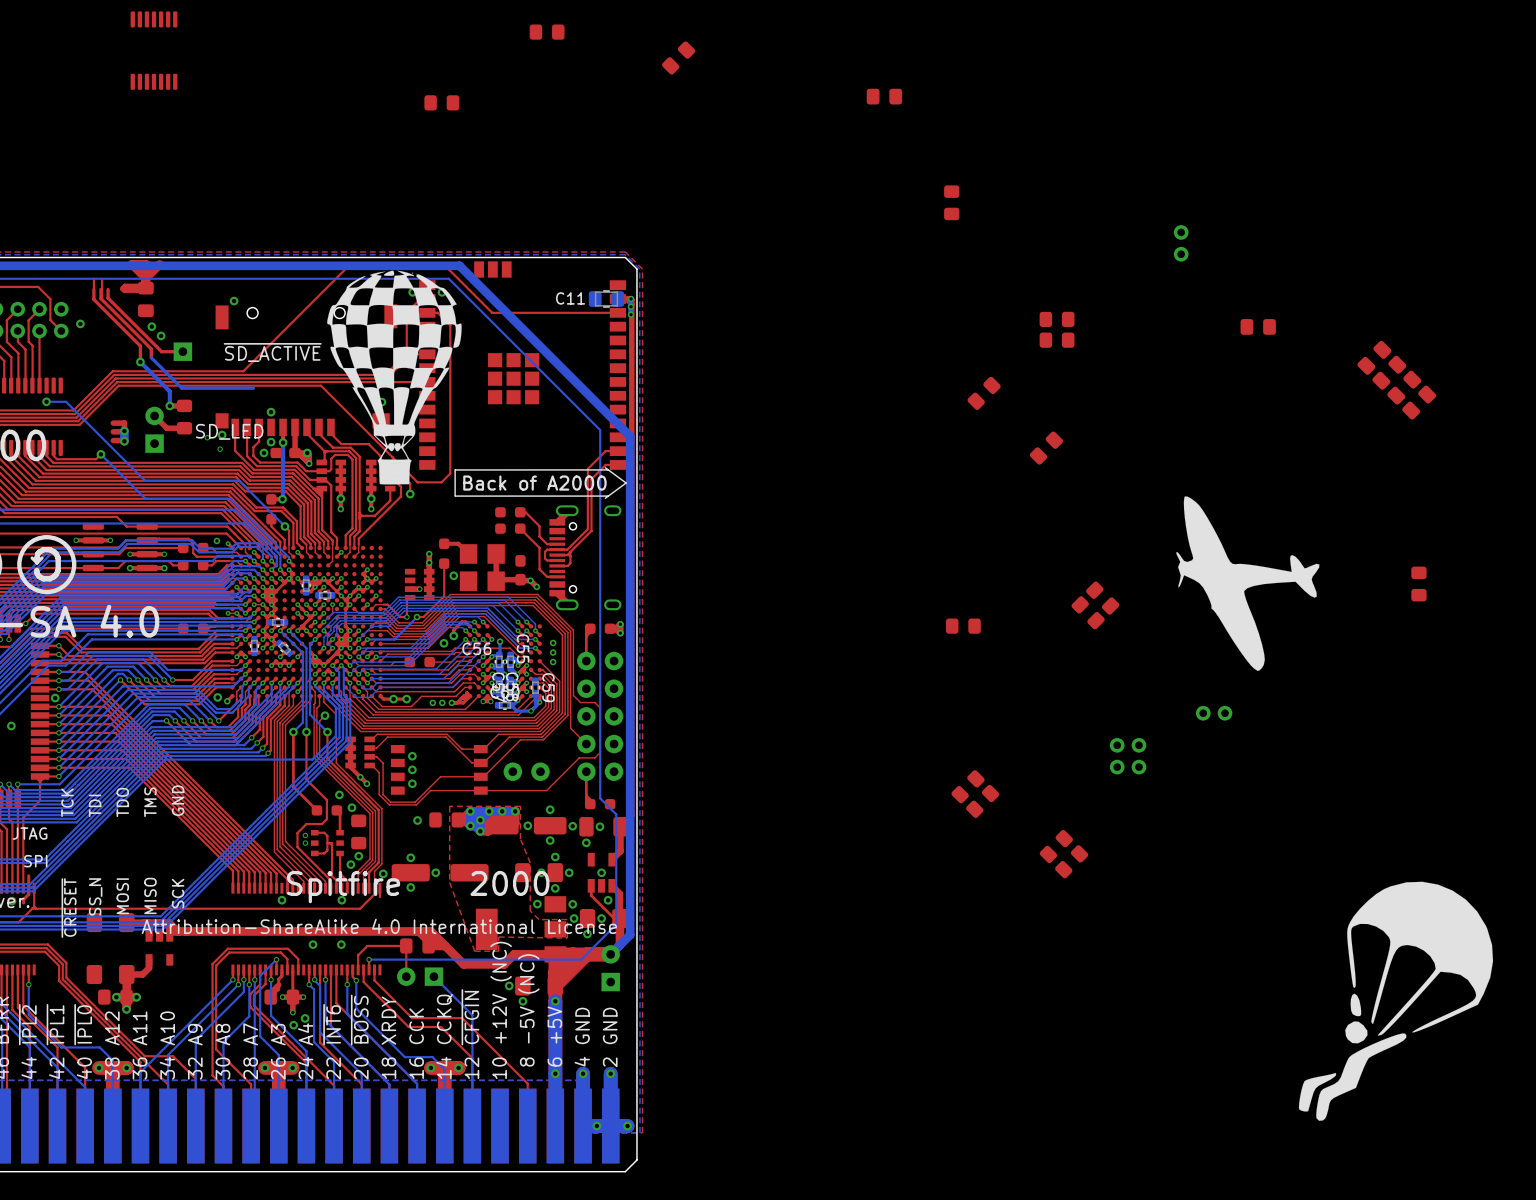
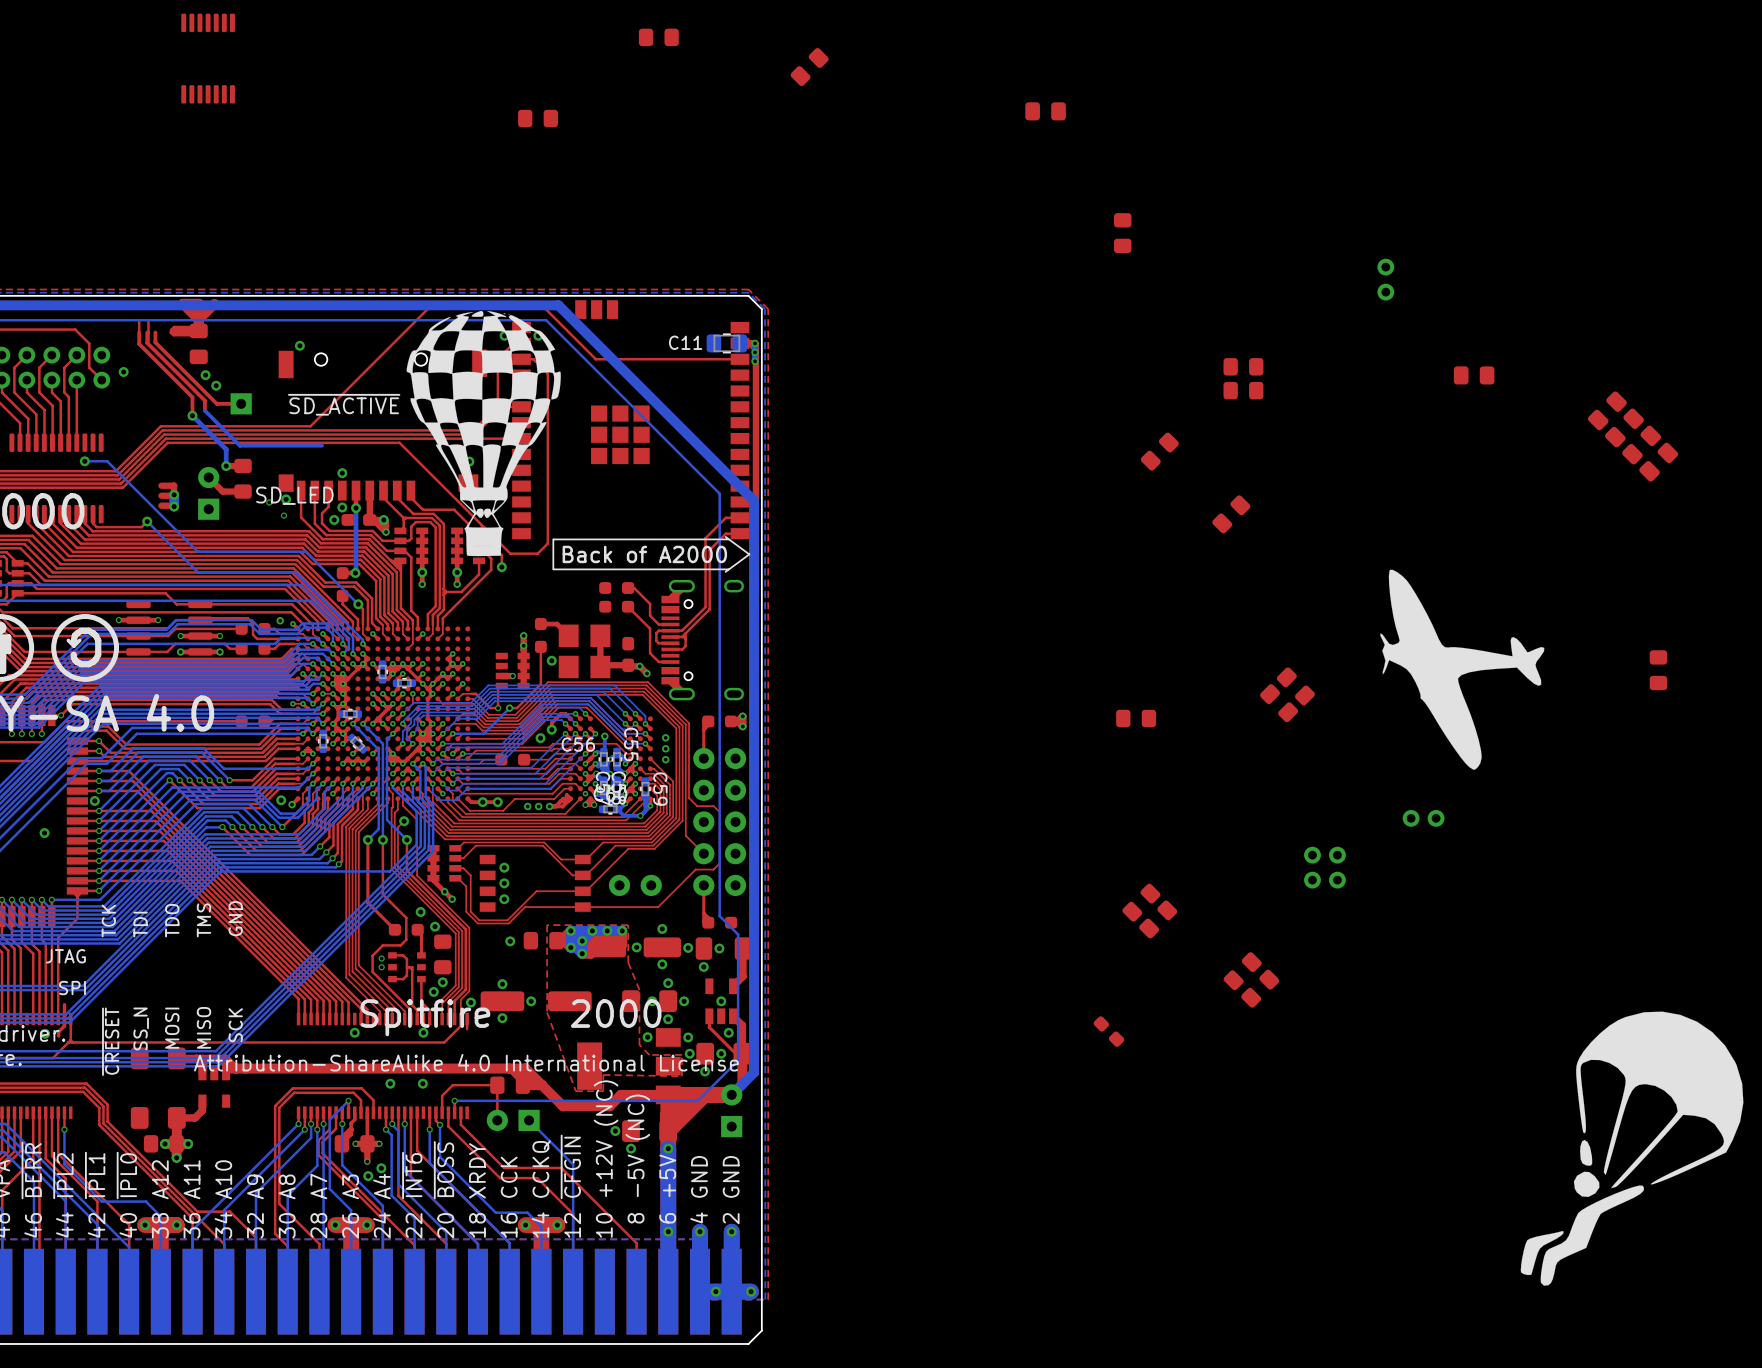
part: none -> (1108, 1031)

